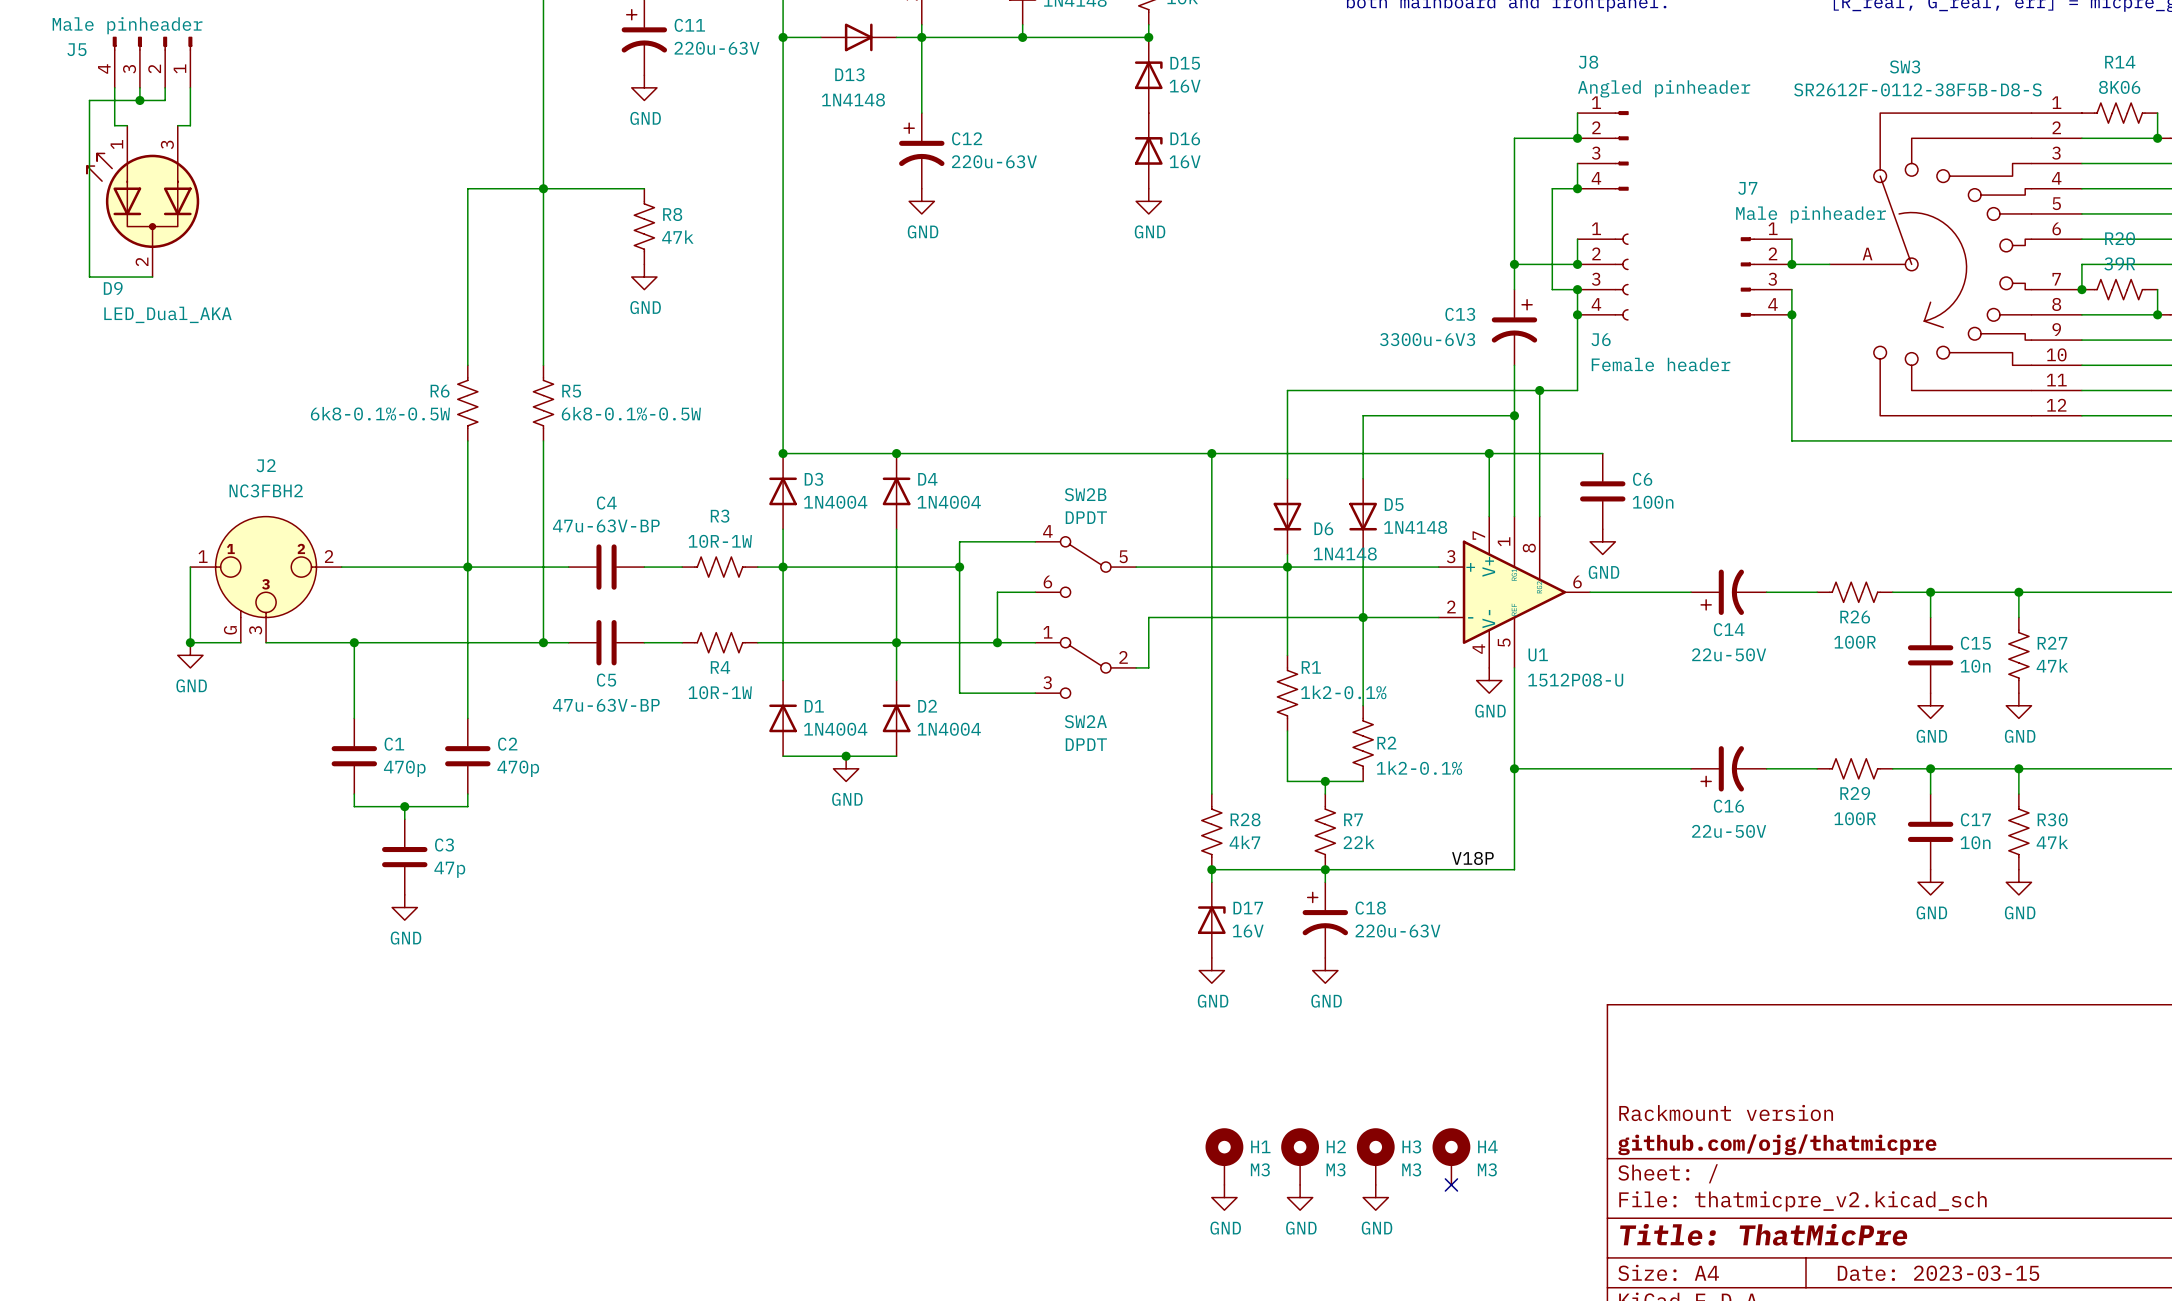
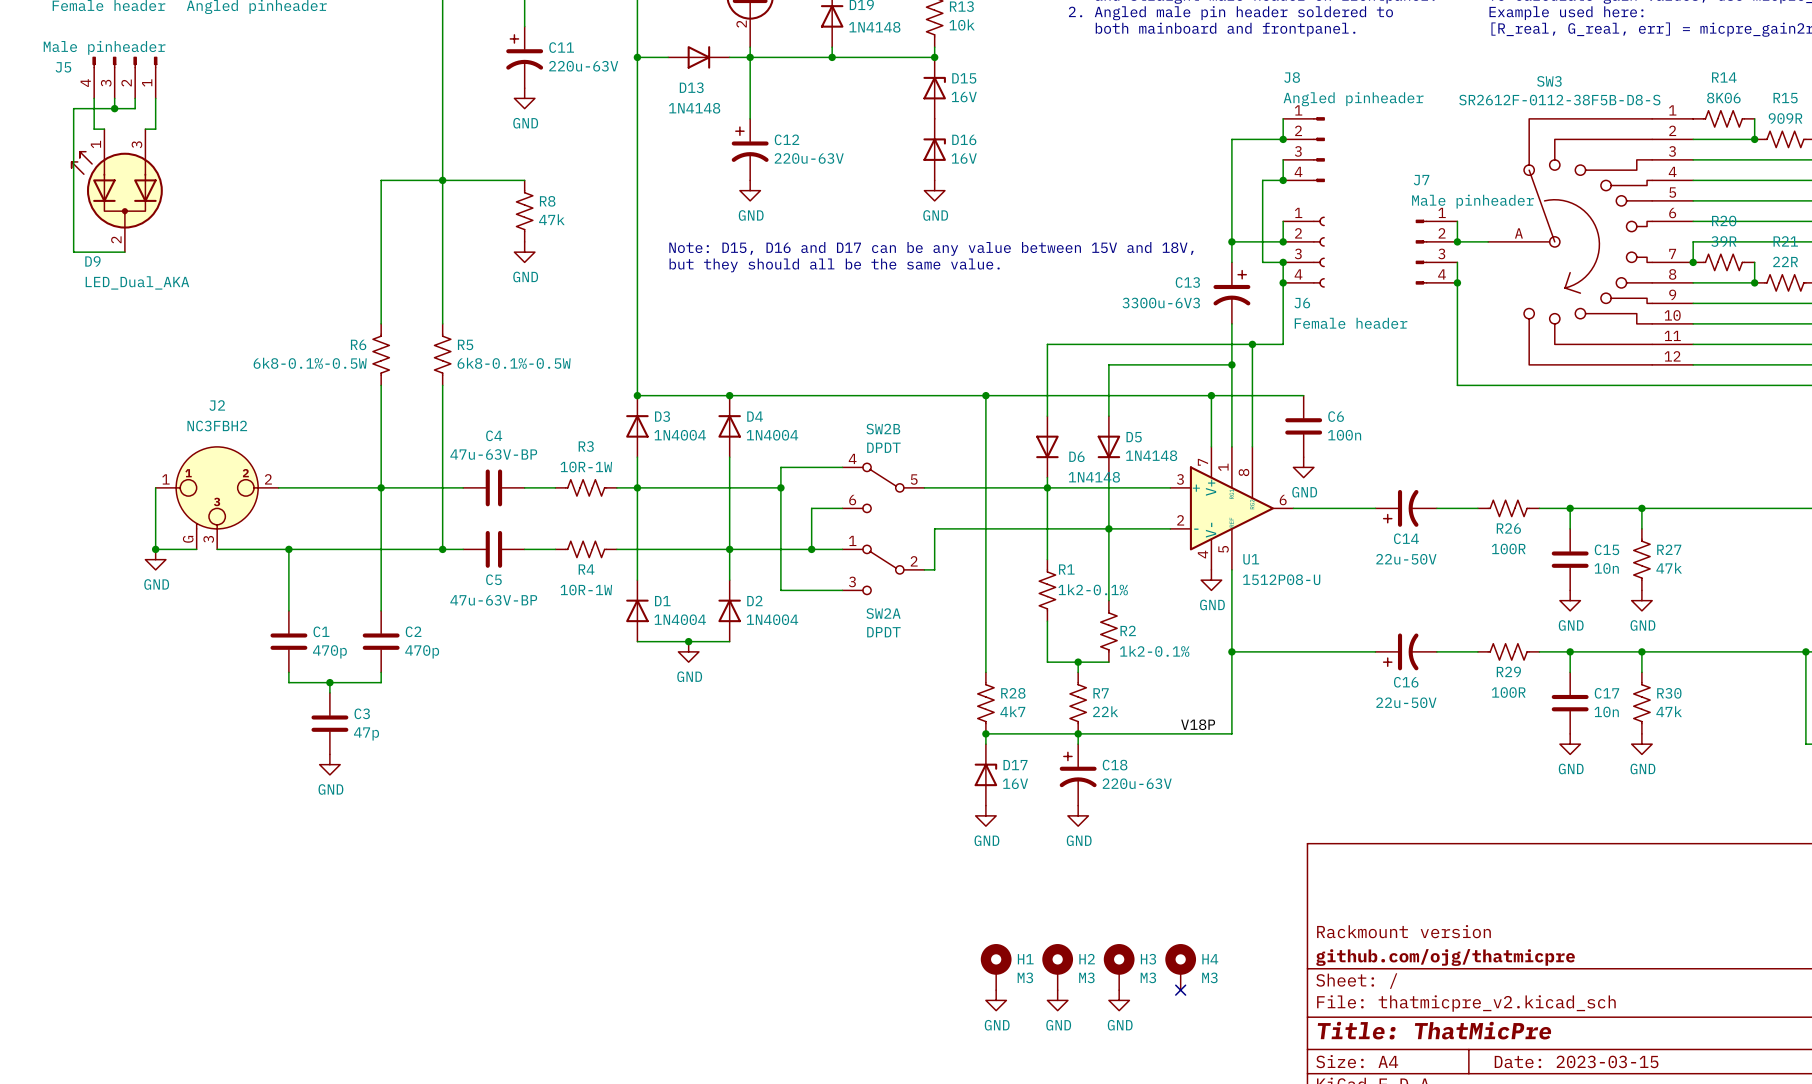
text: none -> Note: D15, D16 and D17 can be any value between 15V and 18V, (931, 248)
text: none -> but they should all be the same value. (834, 265)

